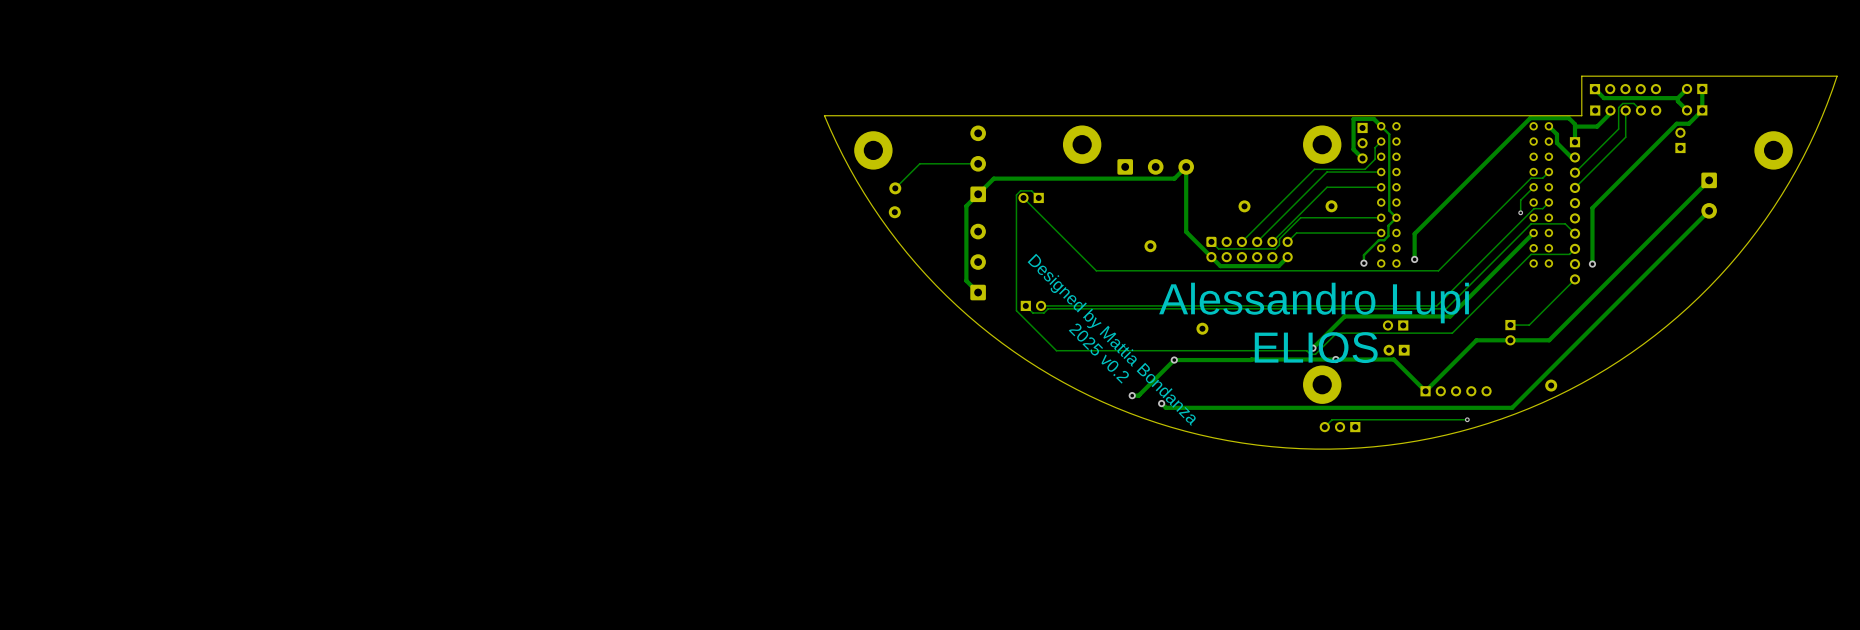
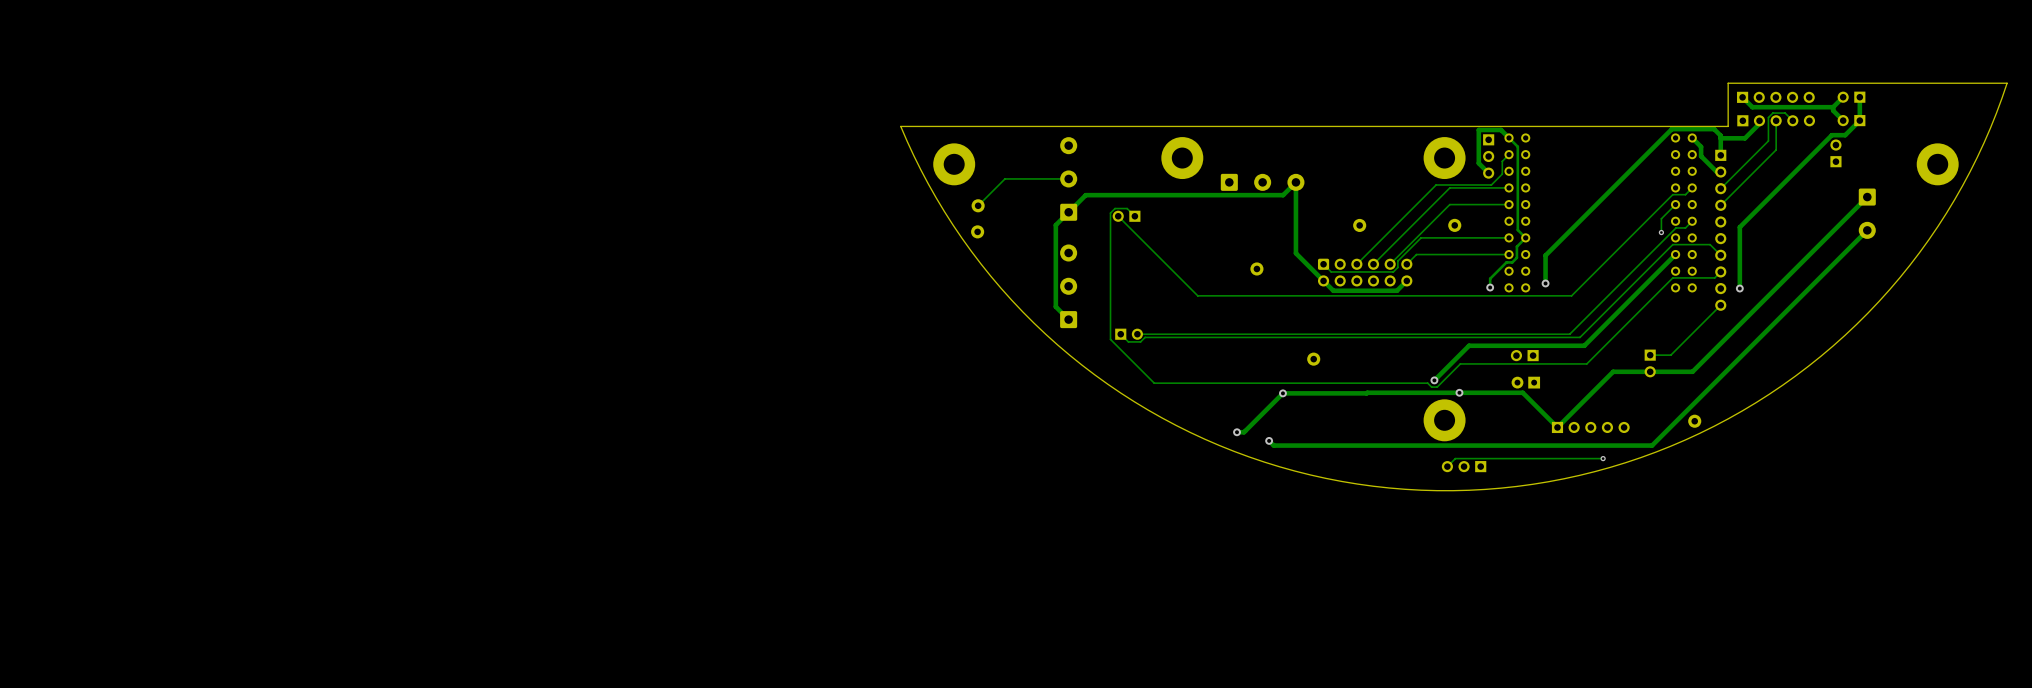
text: Alessandro Lupi (1314, 303) -> none
text: Designed by Mattia Bondanza (1111, 339) -> none
text: ELIOS (1316, 347) -> none
text: 2025 v0.2 (1098, 353) -> none

